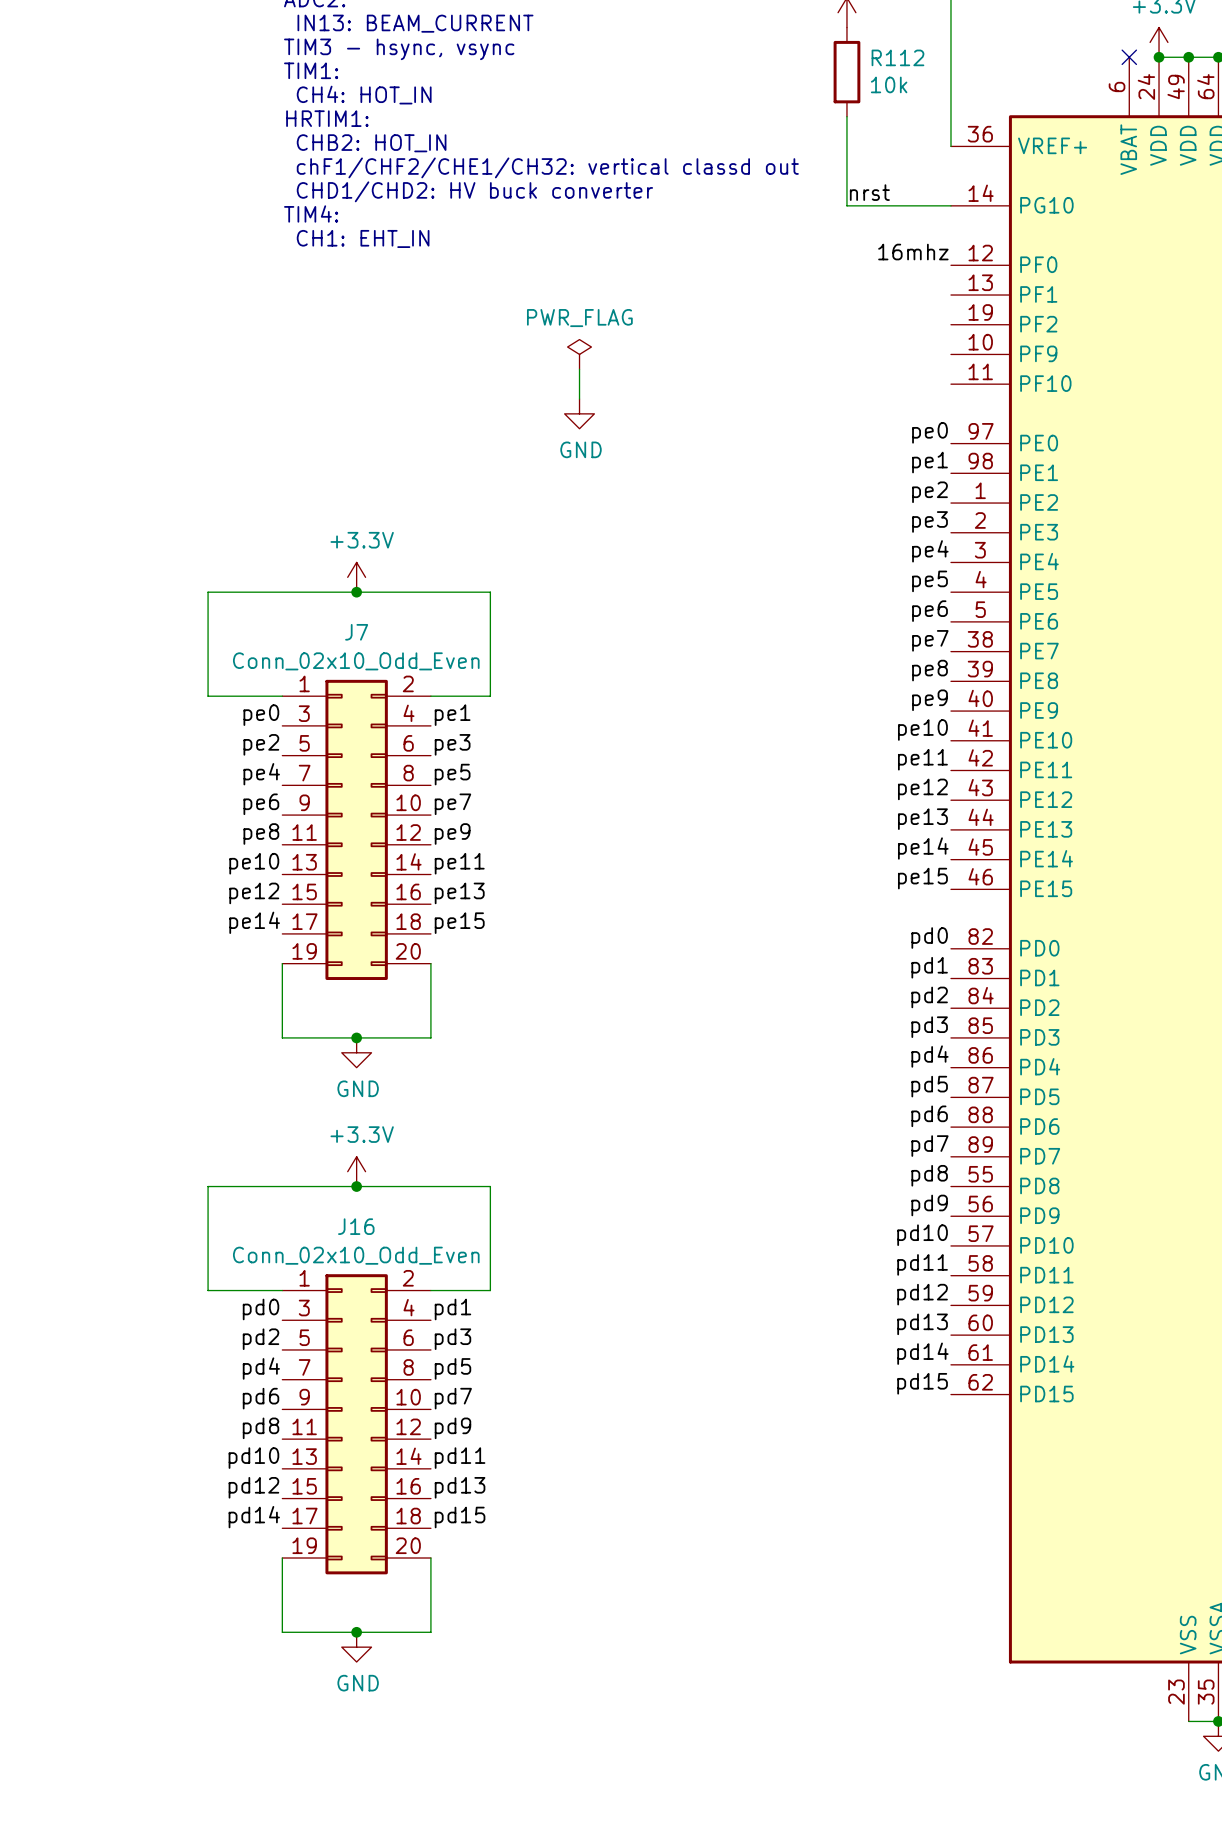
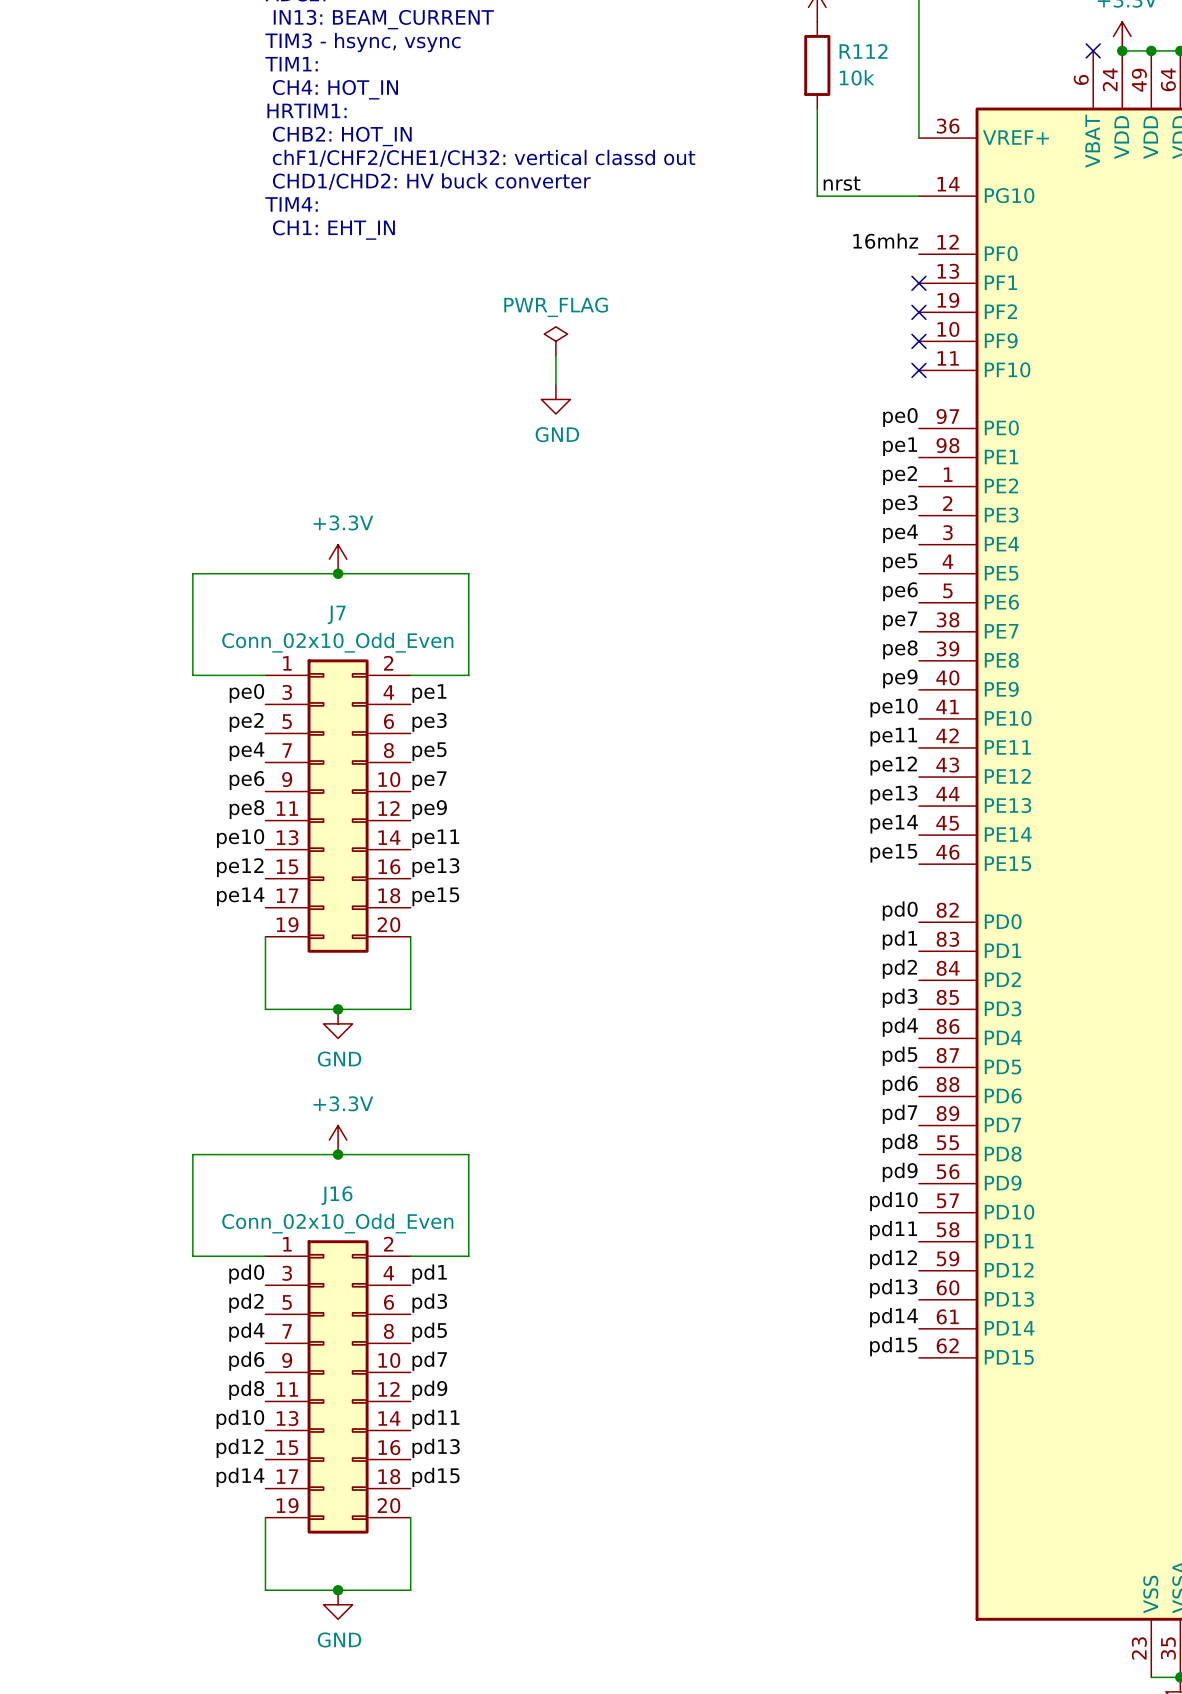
no-connect mark: none -> (918, 283)
no-connect mark: none -> (918, 312)
no-connect mark: none -> (918, 341)
no-connect mark: none -> (918, 370)

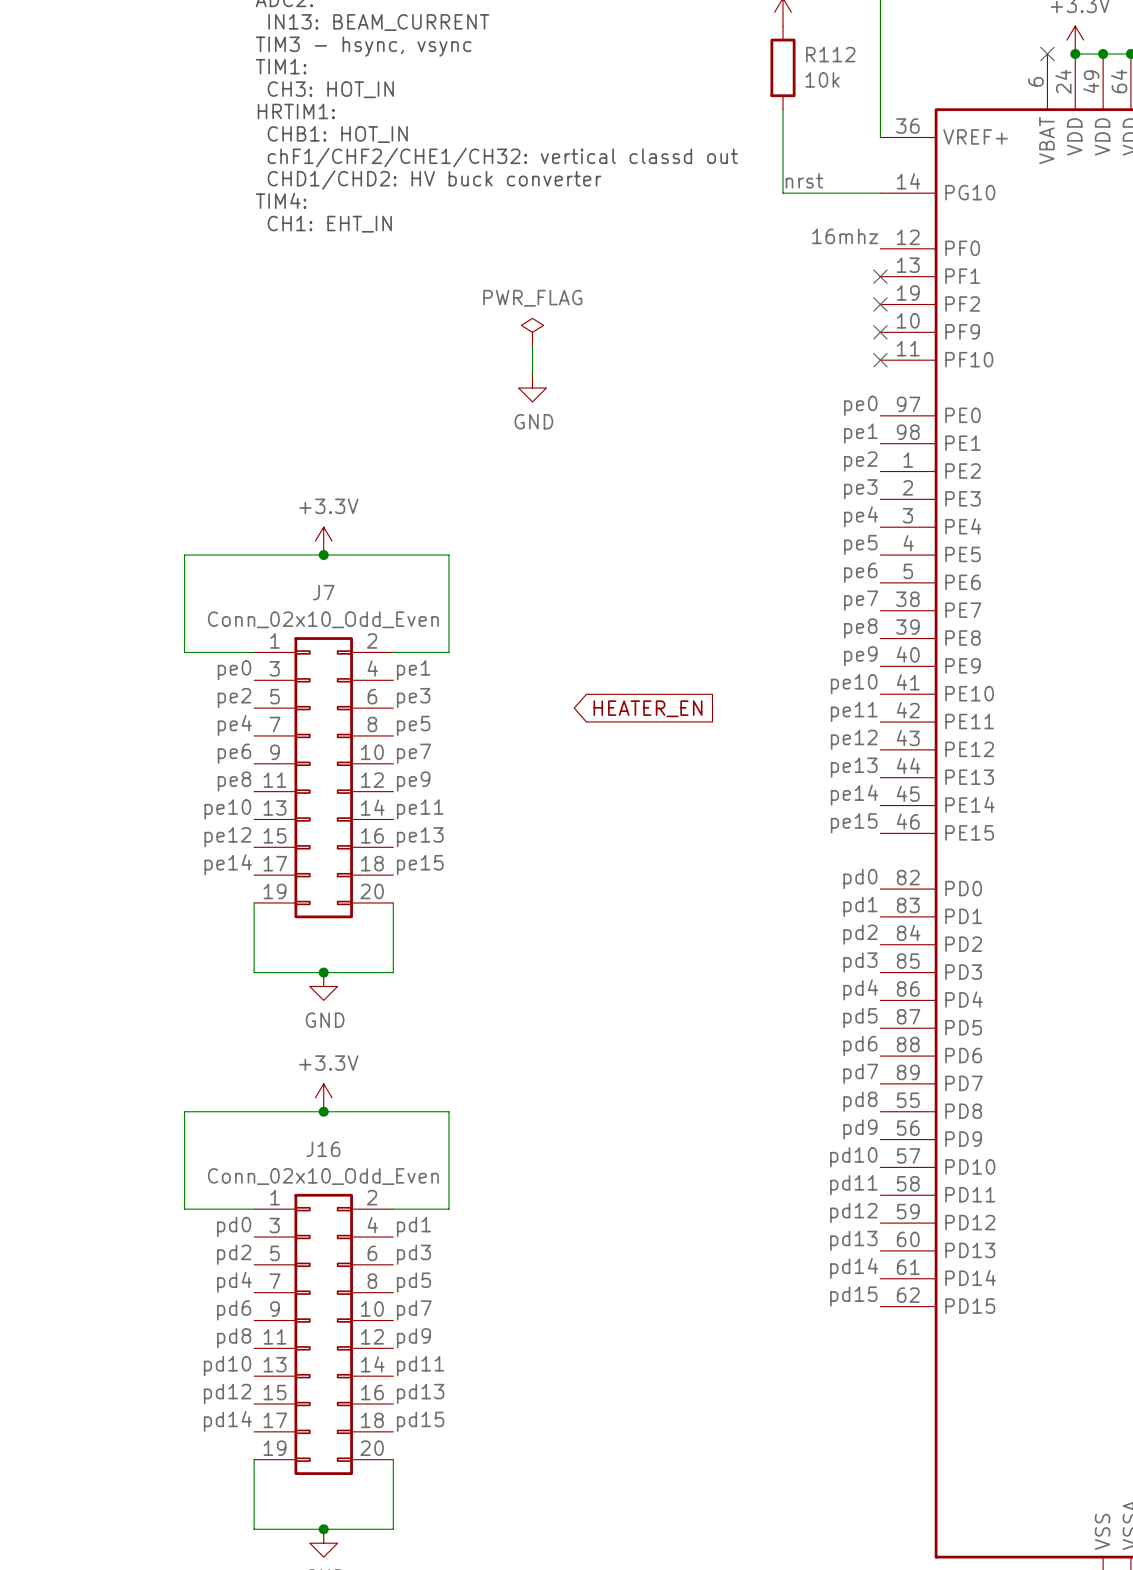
text: CH4: HOT_IN (335, 89) -> CH3: HOT_IN (330, 89)
text: CHB2: HOT_IN (342, 136) -> CHB1: HOT_IN (337, 134)
global label: none -> HEATER_EN (647, 708)

